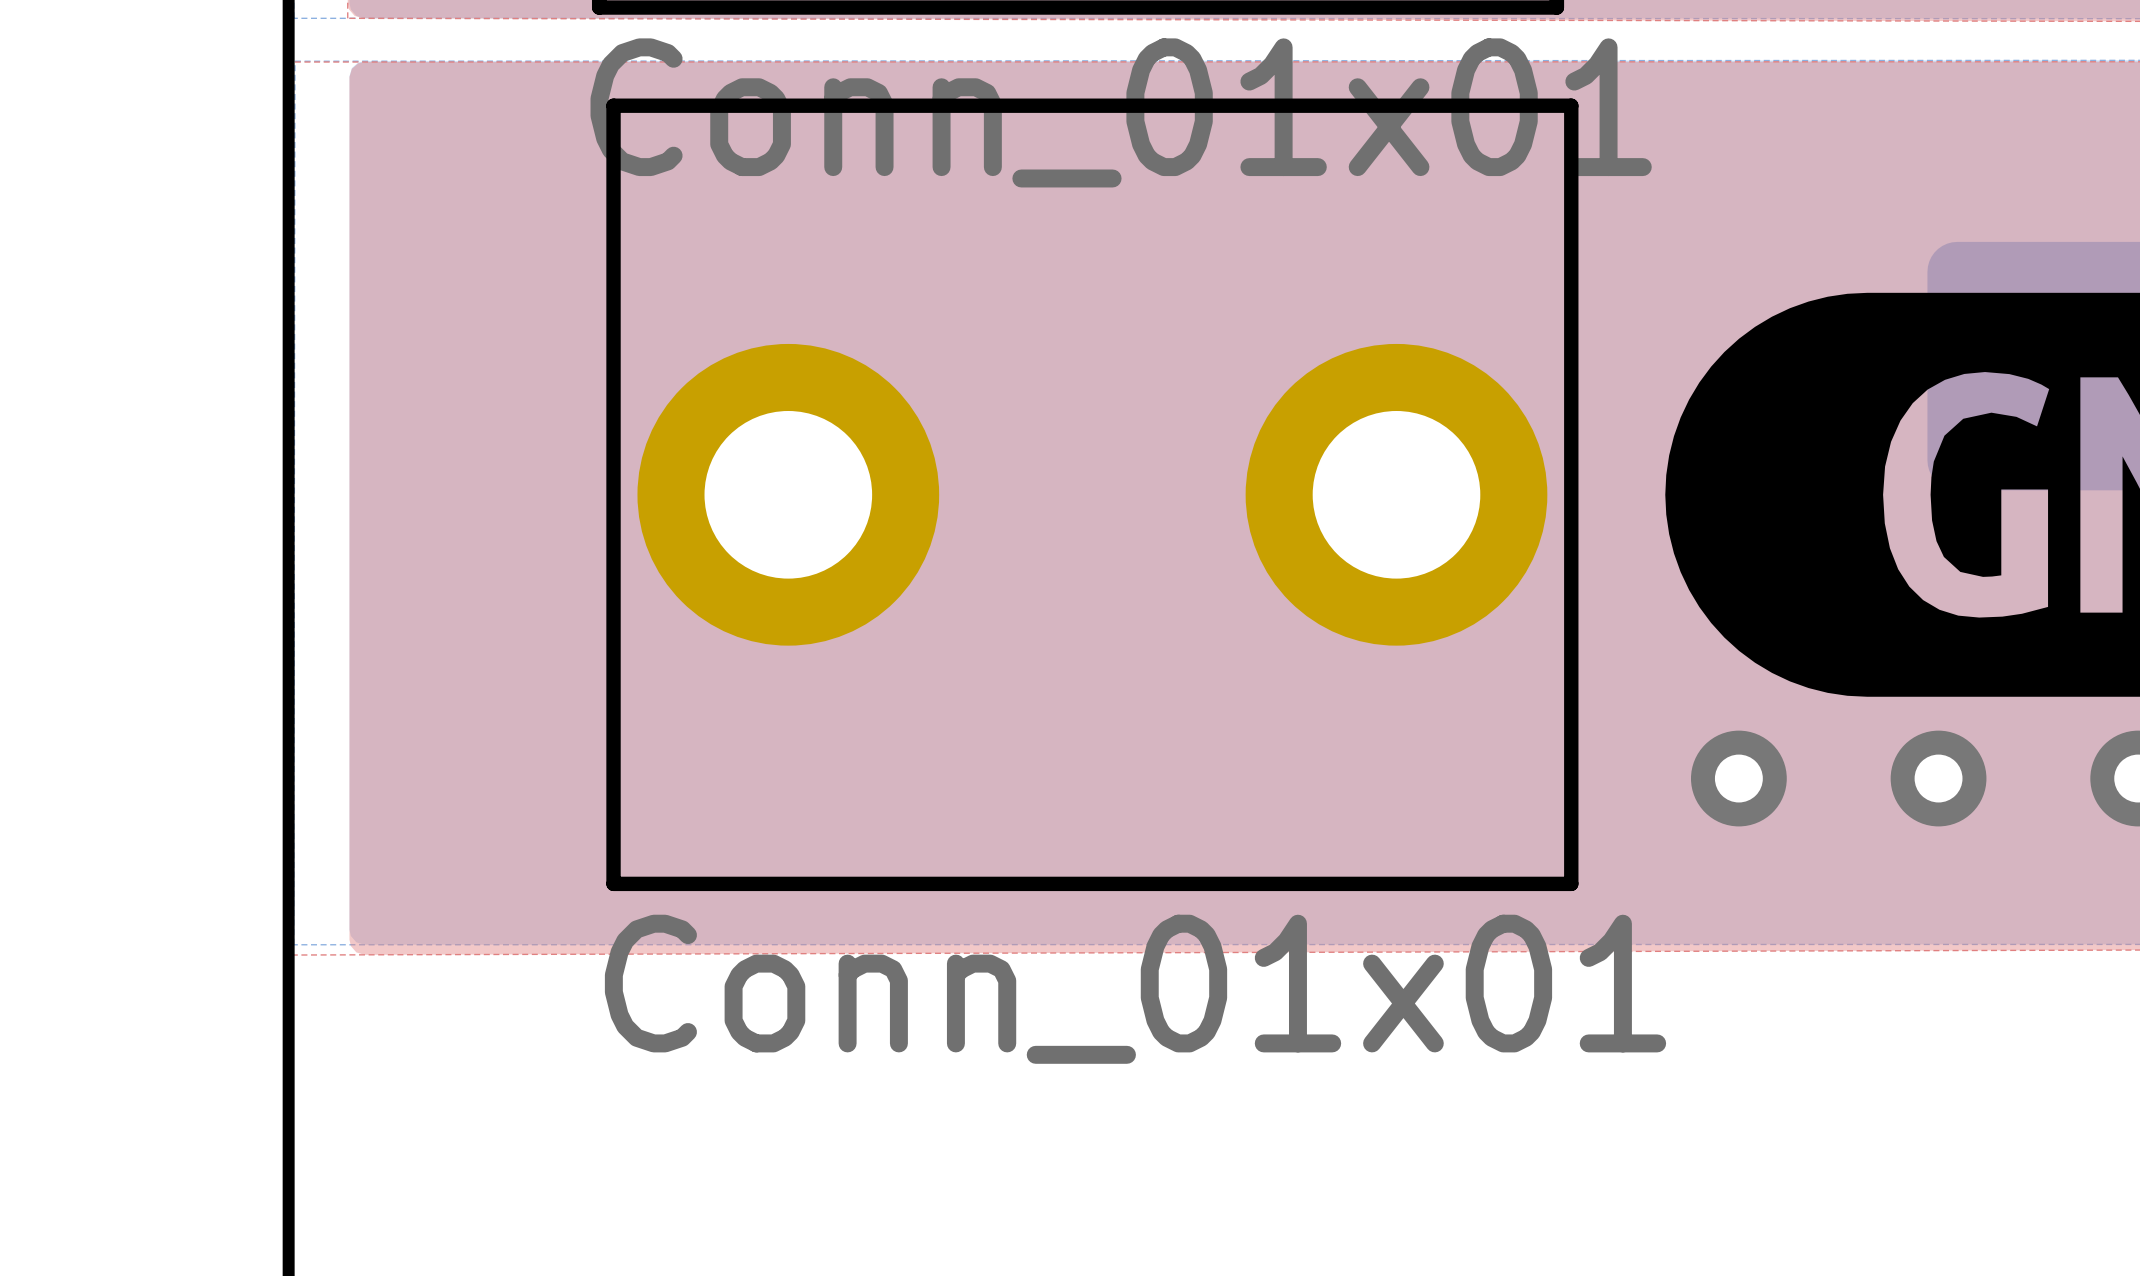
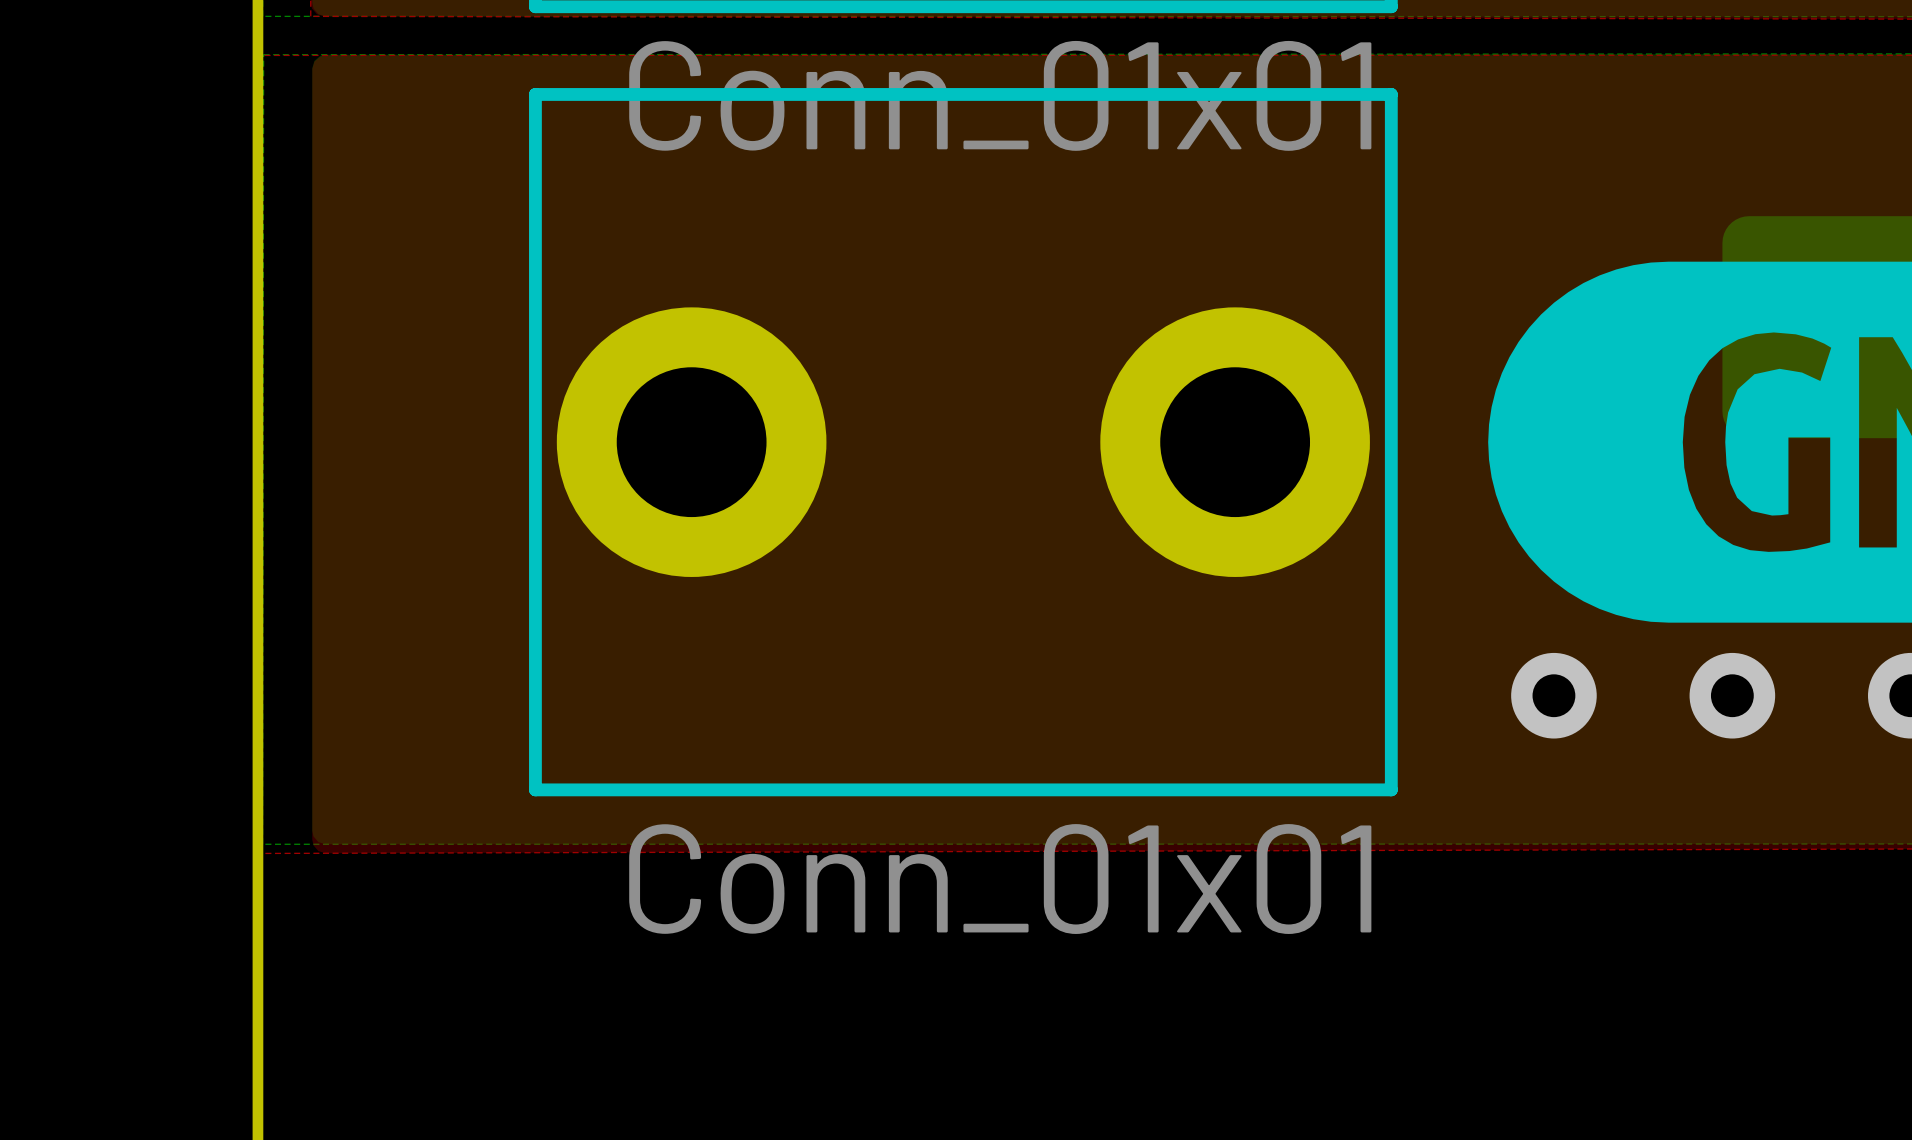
part position: (1092, 494) -> (963, 442)

